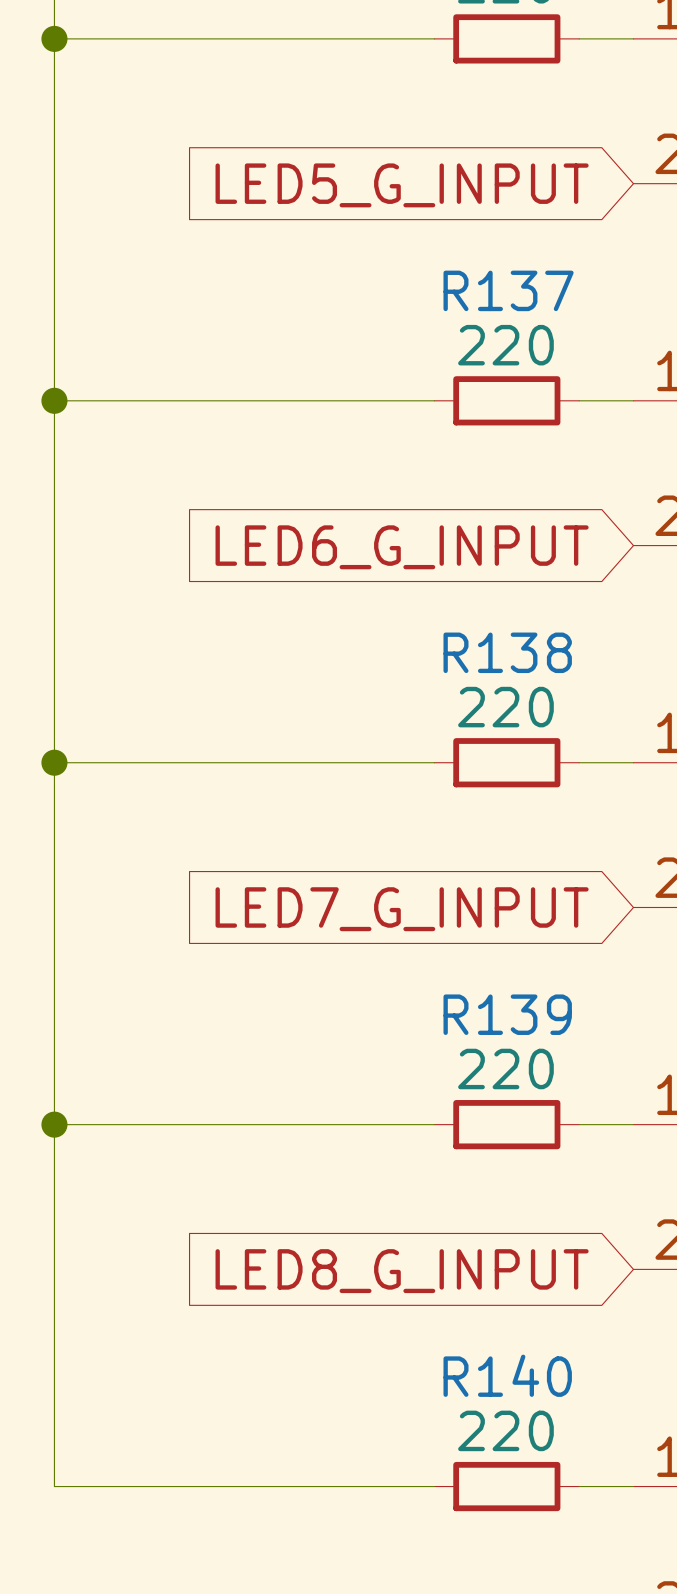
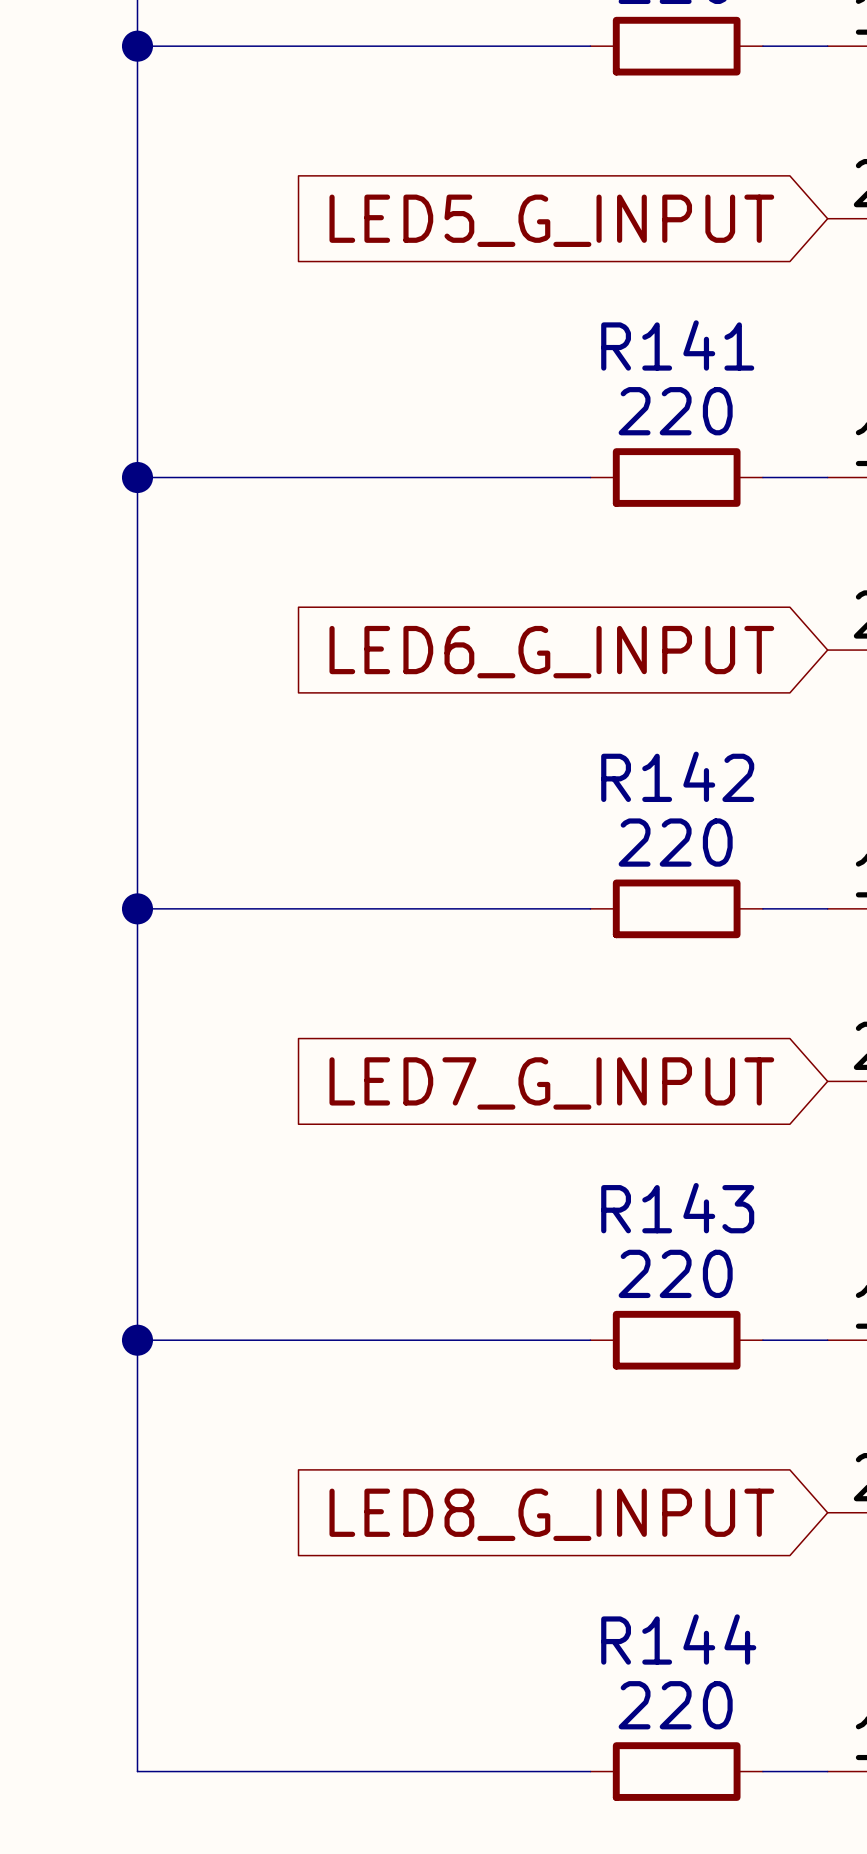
R137 name: R137 (508, 290) -> R141 (677, 345)
R138 name: R138 (507, 652) -> R142 (677, 776)
R139 name: R139 (507, 1014) -> R143 (677, 1208)
R140 name: R140 (507, 1375) -> R144 (678, 1639)

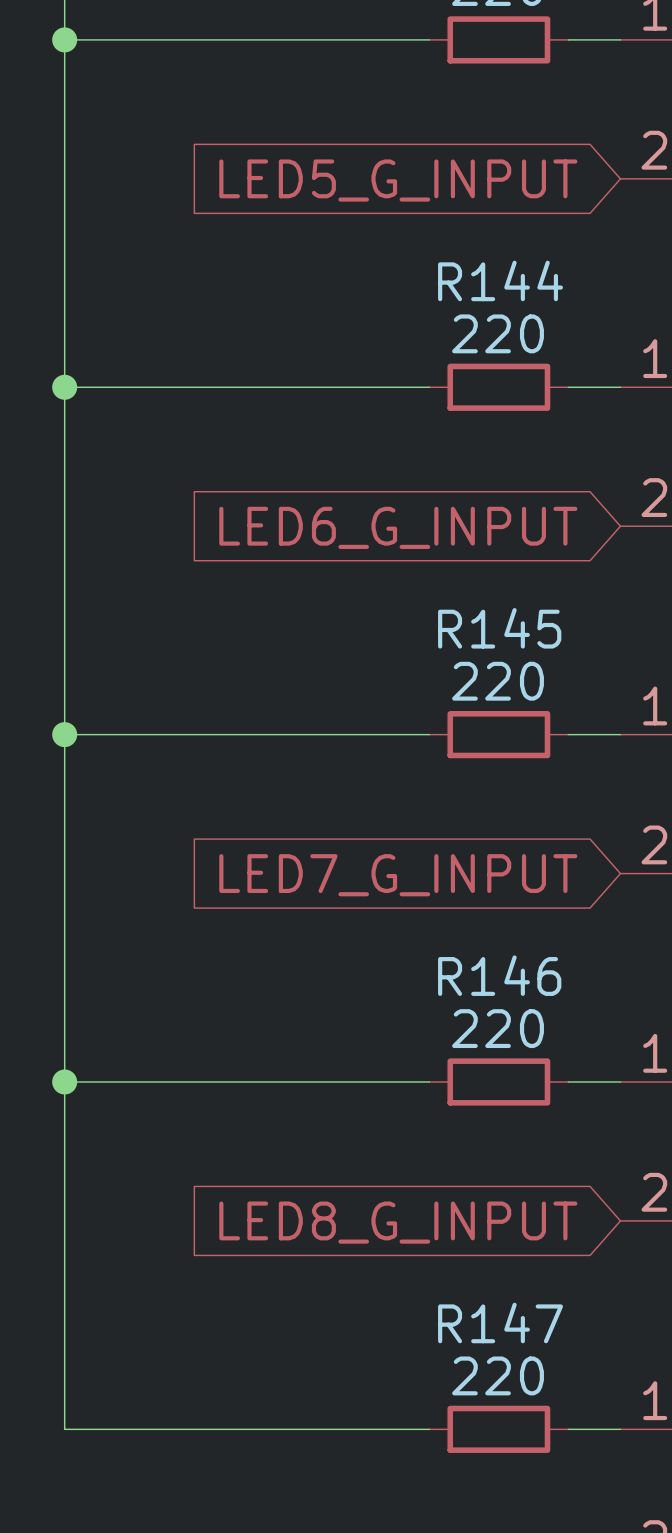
R141 name: R141 (677, 345) -> R144 (500, 280)
R142 name: R142 (677, 776) -> R145 (499, 628)
R143 name: R143 (677, 1208) -> R146 (499, 975)
R144 name: R144 (678, 1639) -> R147 (500, 1323)

